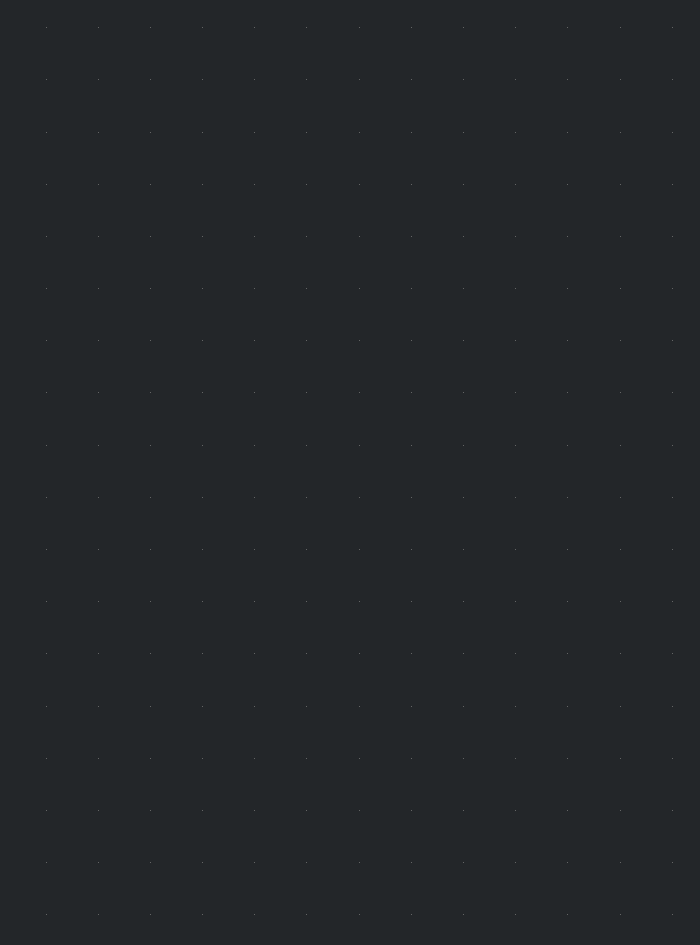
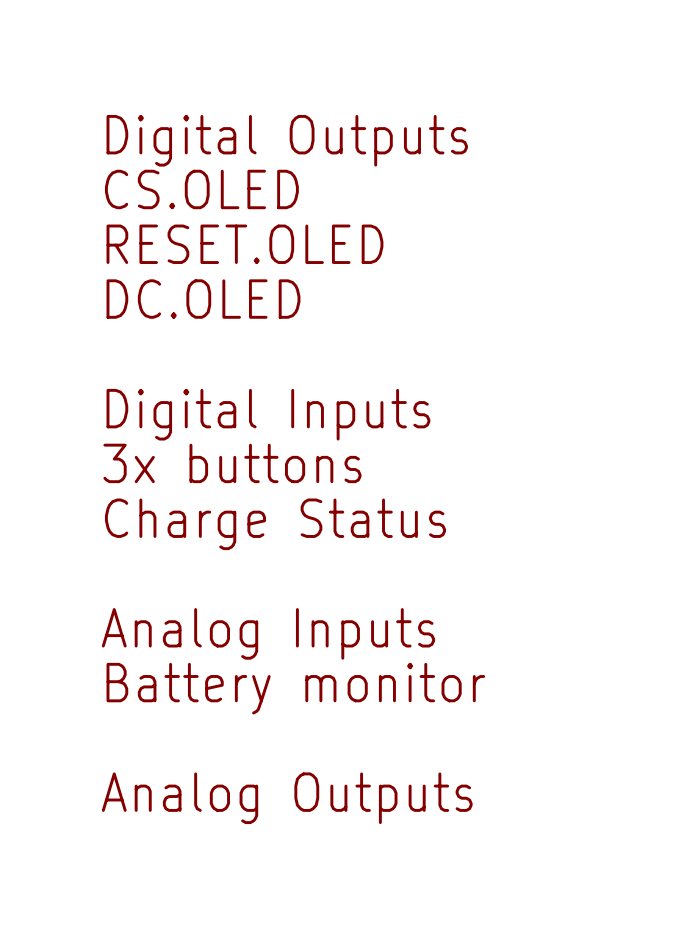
text: none -> Digital Outputs (287, 140)
text: none -> CS.OLED (201, 189)
text: none -> RESET.OLED (244, 244)
text: none -> DC.OLED (203, 299)
text: none -> Digital Inputs (268, 414)
text: none -> 3x buttons (232, 463)
text: none -> Charge Status (275, 524)
text: none -> Analog Inputs (268, 633)
text: none -> Battery monitor (295, 688)
text: none -> Analog Outputs (287, 798)

